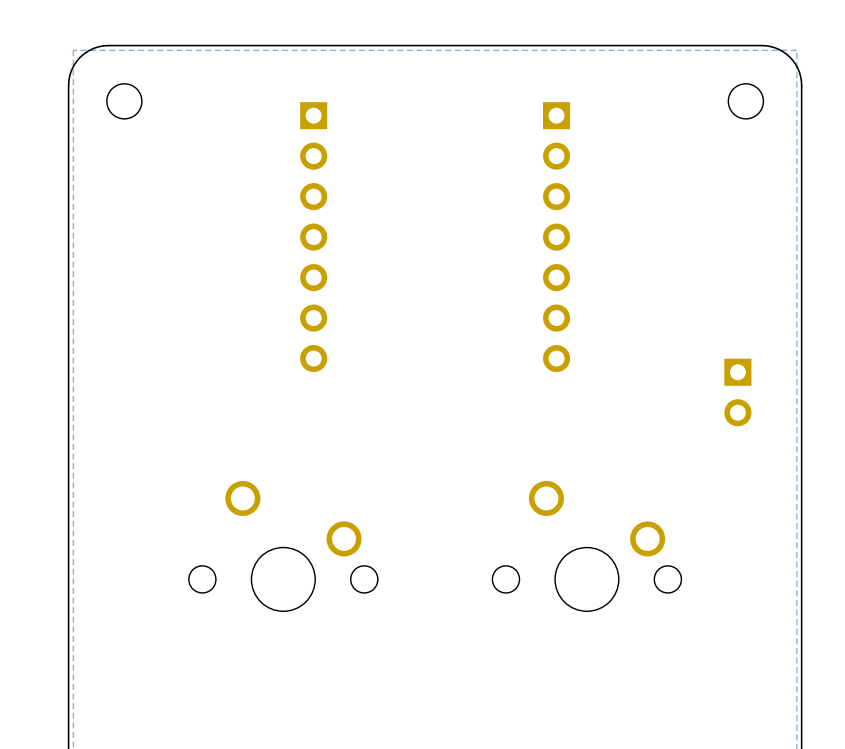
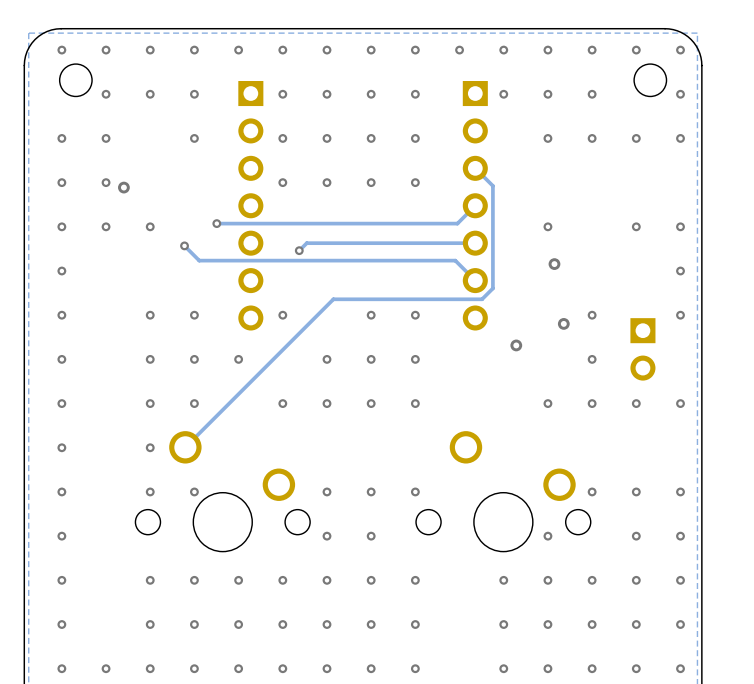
via: none -> (61, 50)
via: none -> (106, 50)
via: none -> (150, 50)
via: none -> (194, 50)
via: none -> (238, 50)
via: none -> (282, 50)
via: none -> (326, 50)
via: none -> (371, 50)
via: none -> (415, 50)
via: none -> (459, 50)
via: none -> (503, 50)
via: none -> (547, 50)
via: none -> (592, 50)
via: none -> (636, 50)
via: none -> (680, 50)
via: none -> (106, 94)
via: none -> (150, 94)
via: none -> (194, 94)
via: none -> (282, 94)
via: none -> (326, 94)
via: none -> (371, 94)
via: none -> (415, 94)
via: none -> (503, 94)
via: none -> (547, 94)
via: none -> (592, 94)
via: none -> (680, 94)
via: none -> (61, 138)
via: none -> (106, 138)
via: none -> (194, 138)
via: none -> (282, 138)
via: none -> (326, 138)
via: none -> (371, 138)
via: none -> (415, 138)
via: none -> (547, 138)
via: none -> (592, 138)
via: none -> (636, 138)
via: none -> (680, 138)
track: none -> (475, 168) (492, 185) (492, 288) (482, 299) (333, 299) (185, 447)
via: none -> (61, 182)
via: none -> (106, 182)
via: none -> (282, 182)
via: none -> (326, 182)
via: none -> (371, 182)
via: none -> (415, 182)
via: none -> (123, 187)
track: none -> (475, 205) (457, 223) (216, 223)
via: none -> (216, 223)
via: none -> (61, 226)
via: none -> (106, 226)
via: none -> (150, 226)
via: none -> (547, 226)
via: none -> (636, 226)
via: none -> (680, 226)
track: none -> (475, 243) (306, 243) (299, 250)
track: none -> (184, 245) (199, 260) (455, 260) (475, 280)
via: none -> (184, 245)
via: none -> (299, 250)
via: none -> (554, 264)
via: none -> (61, 271)
via: none -> (680, 271)
via: none -> (61, 315)
via: none -> (150, 315)
via: none -> (194, 315)
via: none -> (282, 315)
via: none -> (371, 315)
via: none -> (415, 315)
via: none -> (592, 315)
via: none -> (680, 315)
via: none -> (563, 323)
via: none -> (516, 345)
via: none -> (61, 359)
via: none -> (150, 359)
via: none -> (194, 359)
via: none -> (238, 359)
via: none -> (326, 359)
via: none -> (371, 359)
via: none -> (415, 359)
via: none -> (592, 359)
via: none -> (61, 403)
via: none -> (150, 403)
via: none -> (194, 403)
via: none -> (282, 403)
via: none -> (326, 403)
via: none -> (371, 403)
via: none -> (415, 403)
via: none -> (547, 403)
via: none -> (592, 403)
via: none -> (636, 403)
via: none -> (680, 403)
via: none -> (61, 447)
via: none -> (150, 447)
via: none -> (61, 491)
via: none -> (150, 491)
via: none -> (194, 491)
via: none -> (326, 491)
via: none -> (371, 491)
via: none -> (415, 491)
via: none -> (592, 491)
via: none -> (636, 491)
via: none -> (680, 491)
via: none -> (61, 536)
via: none -> (326, 536)
via: none -> (371, 536)
via: none -> (547, 536)
via: none -> (636, 536)
via: none -> (680, 536)
via: none -> (61, 580)
via: none -> (150, 580)
via: none -> (194, 580)
via: none -> (238, 580)
via: none -> (282, 580)
via: none -> (326, 580)
via: none -> (371, 580)
via: none -> (415, 580)
via: none -> (503, 580)
via: none -> (547, 580)
via: none -> (592, 580)
via: none -> (636, 580)
via: none -> (680, 580)
via: none -> (61, 624)
via: none -> (150, 624)
via: none -> (194, 624)
via: none -> (238, 624)
via: none -> (282, 624)
via: none -> (326, 624)
via: none -> (371, 624)
via: none -> (415, 624)
via: none -> (503, 624)
via: none -> (547, 624)
via: none -> (592, 624)
via: none -> (636, 624)
via: none -> (680, 624)
via: none -> (61, 668)
via: none -> (106, 668)
via: none -> (150, 668)
via: none -> (194, 668)
via: none -> (238, 668)
via: none -> (282, 668)
via: none -> (326, 668)
via: none -> (371, 668)
via: none -> (415, 668)
via: none -> (503, 668)
via: none -> (547, 668)
via: none -> (592, 668)
via: none -> (636, 668)
via: none -> (680, 668)

